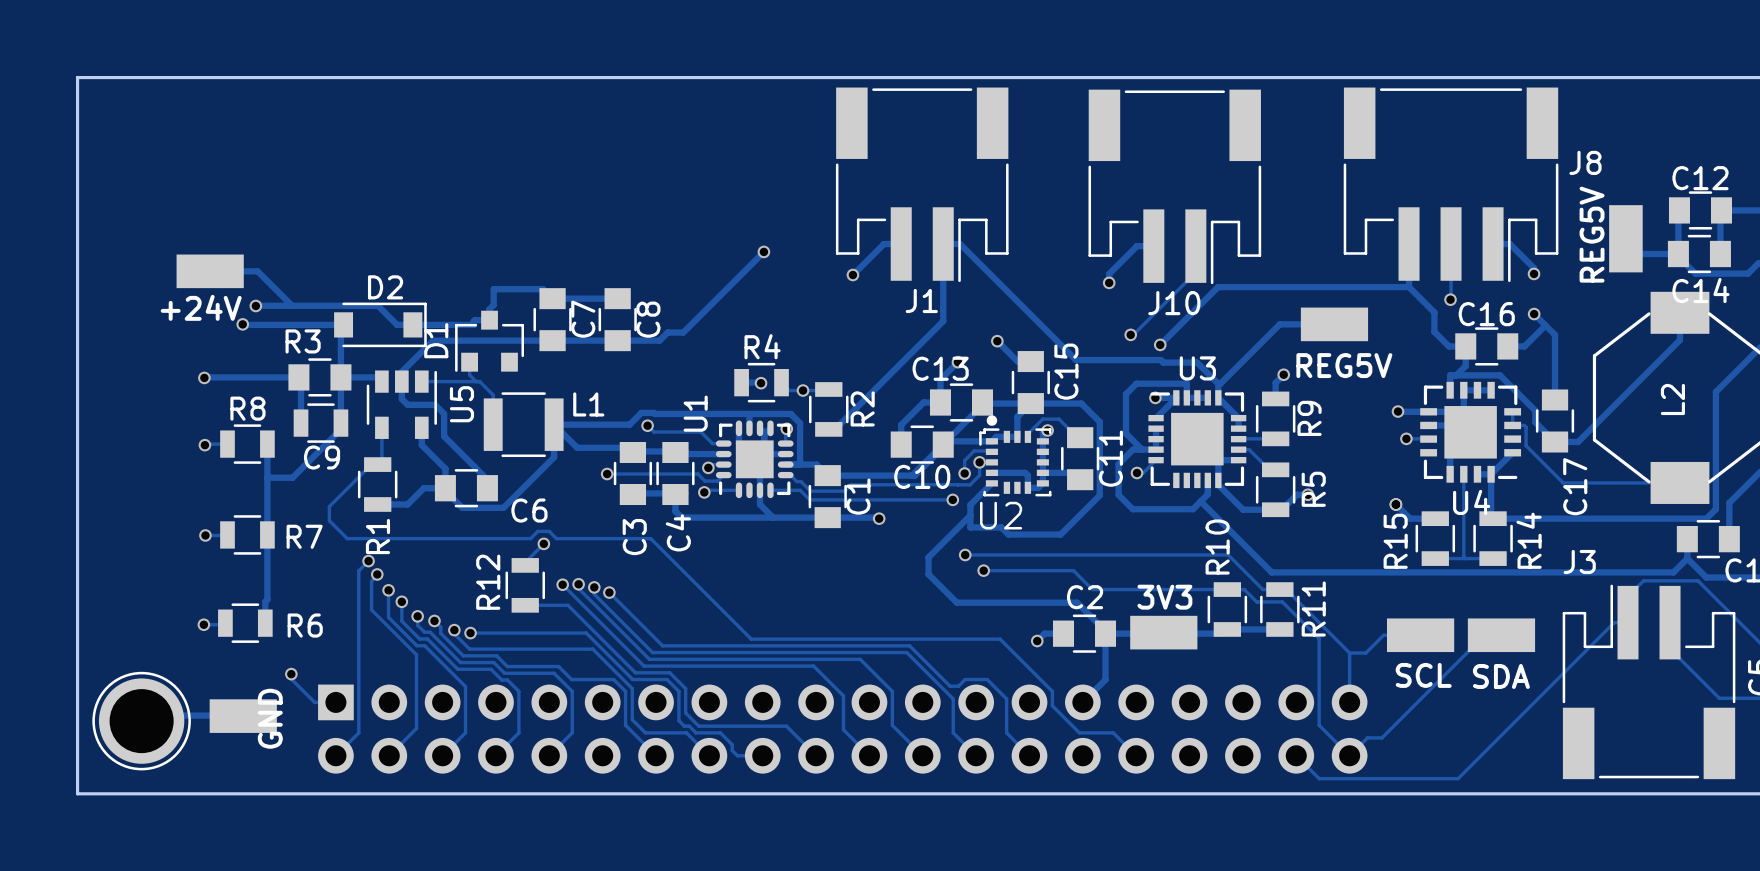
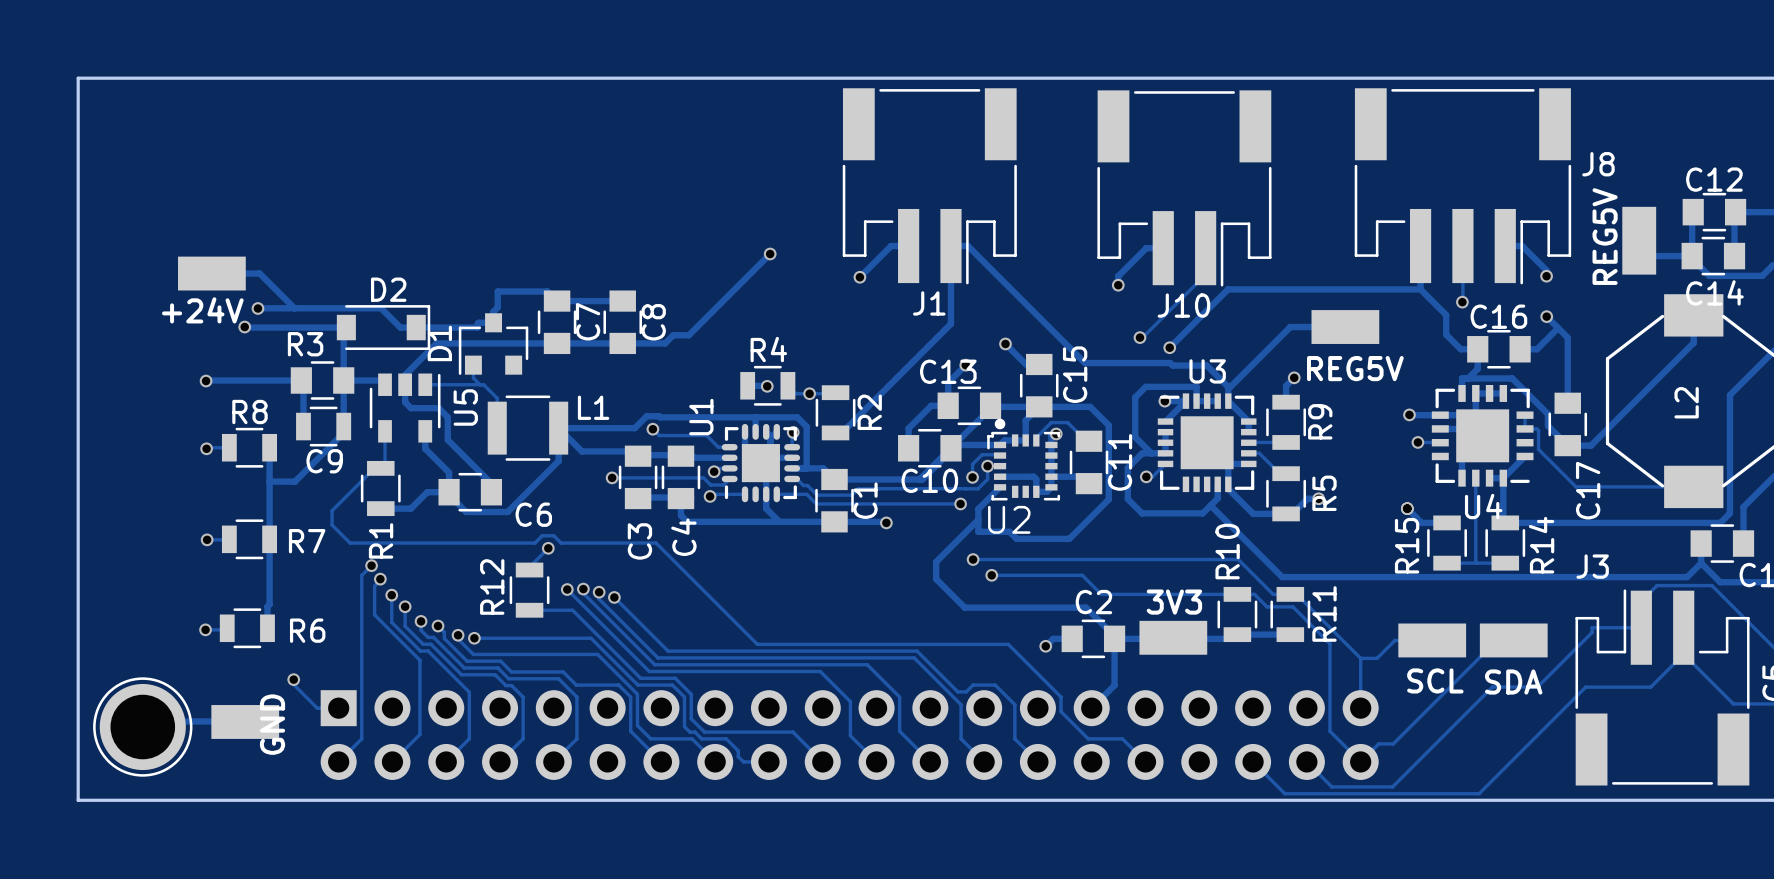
track: (1614, 622) (1458, 778) (1319, 778) -> (1627, 627) (1592, 627) (1592, 632) (1537, 687) (1492, 687) (1392, 786) (1331, 786) (1329, 785)
track: none -> (1683, 654) (1650, 687) (1585, 687) (1479, 793) (1284, 793) (1253, 761)

